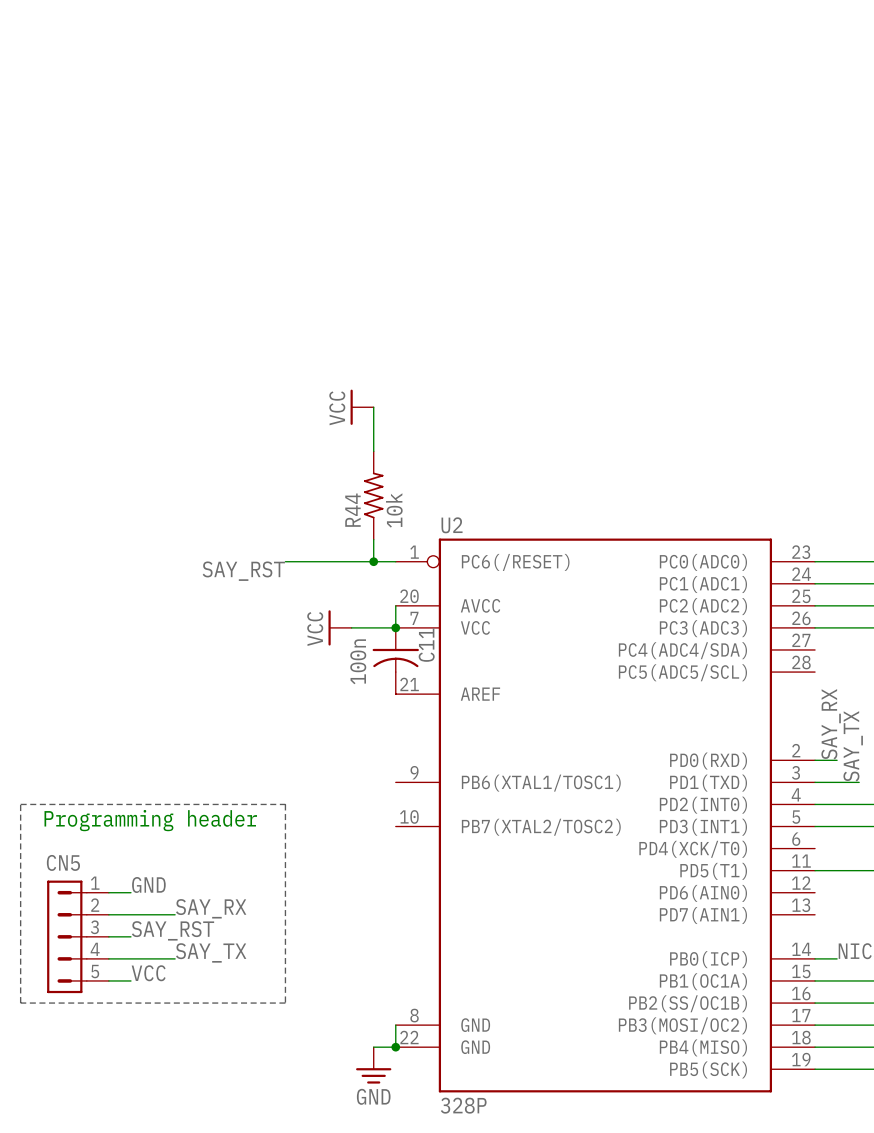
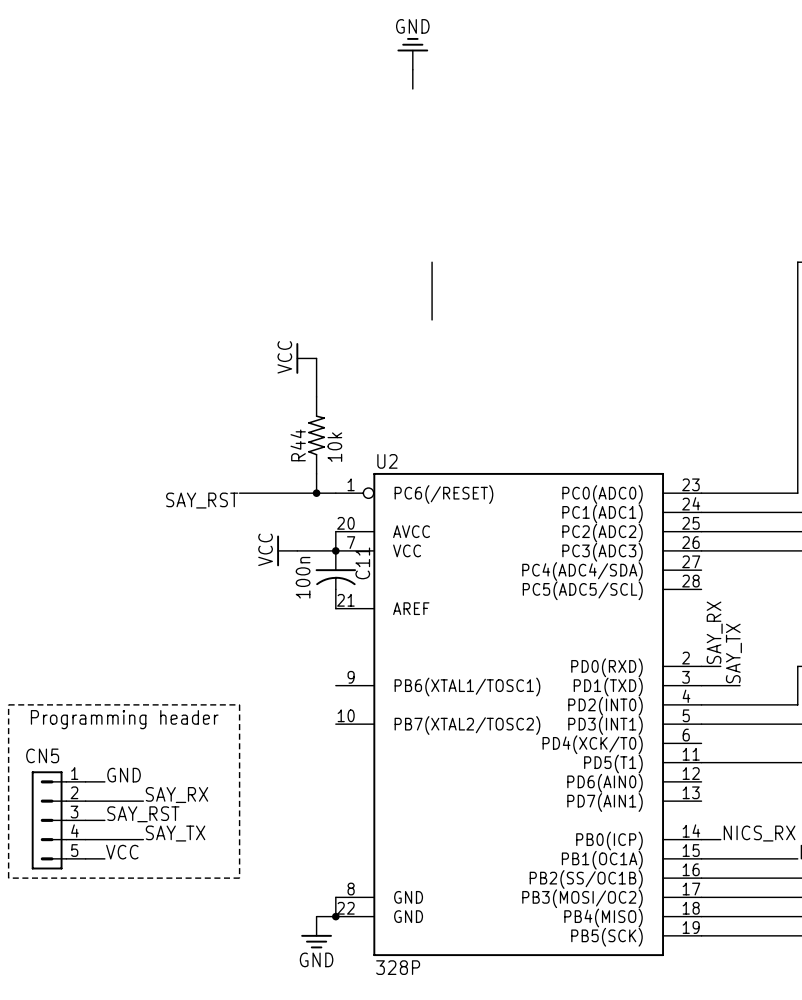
power symbol: none -> GND (412, 53)
wire: none -> (412, 69) (412, 88)
wire: none -> (432, 262) (432, 319)

